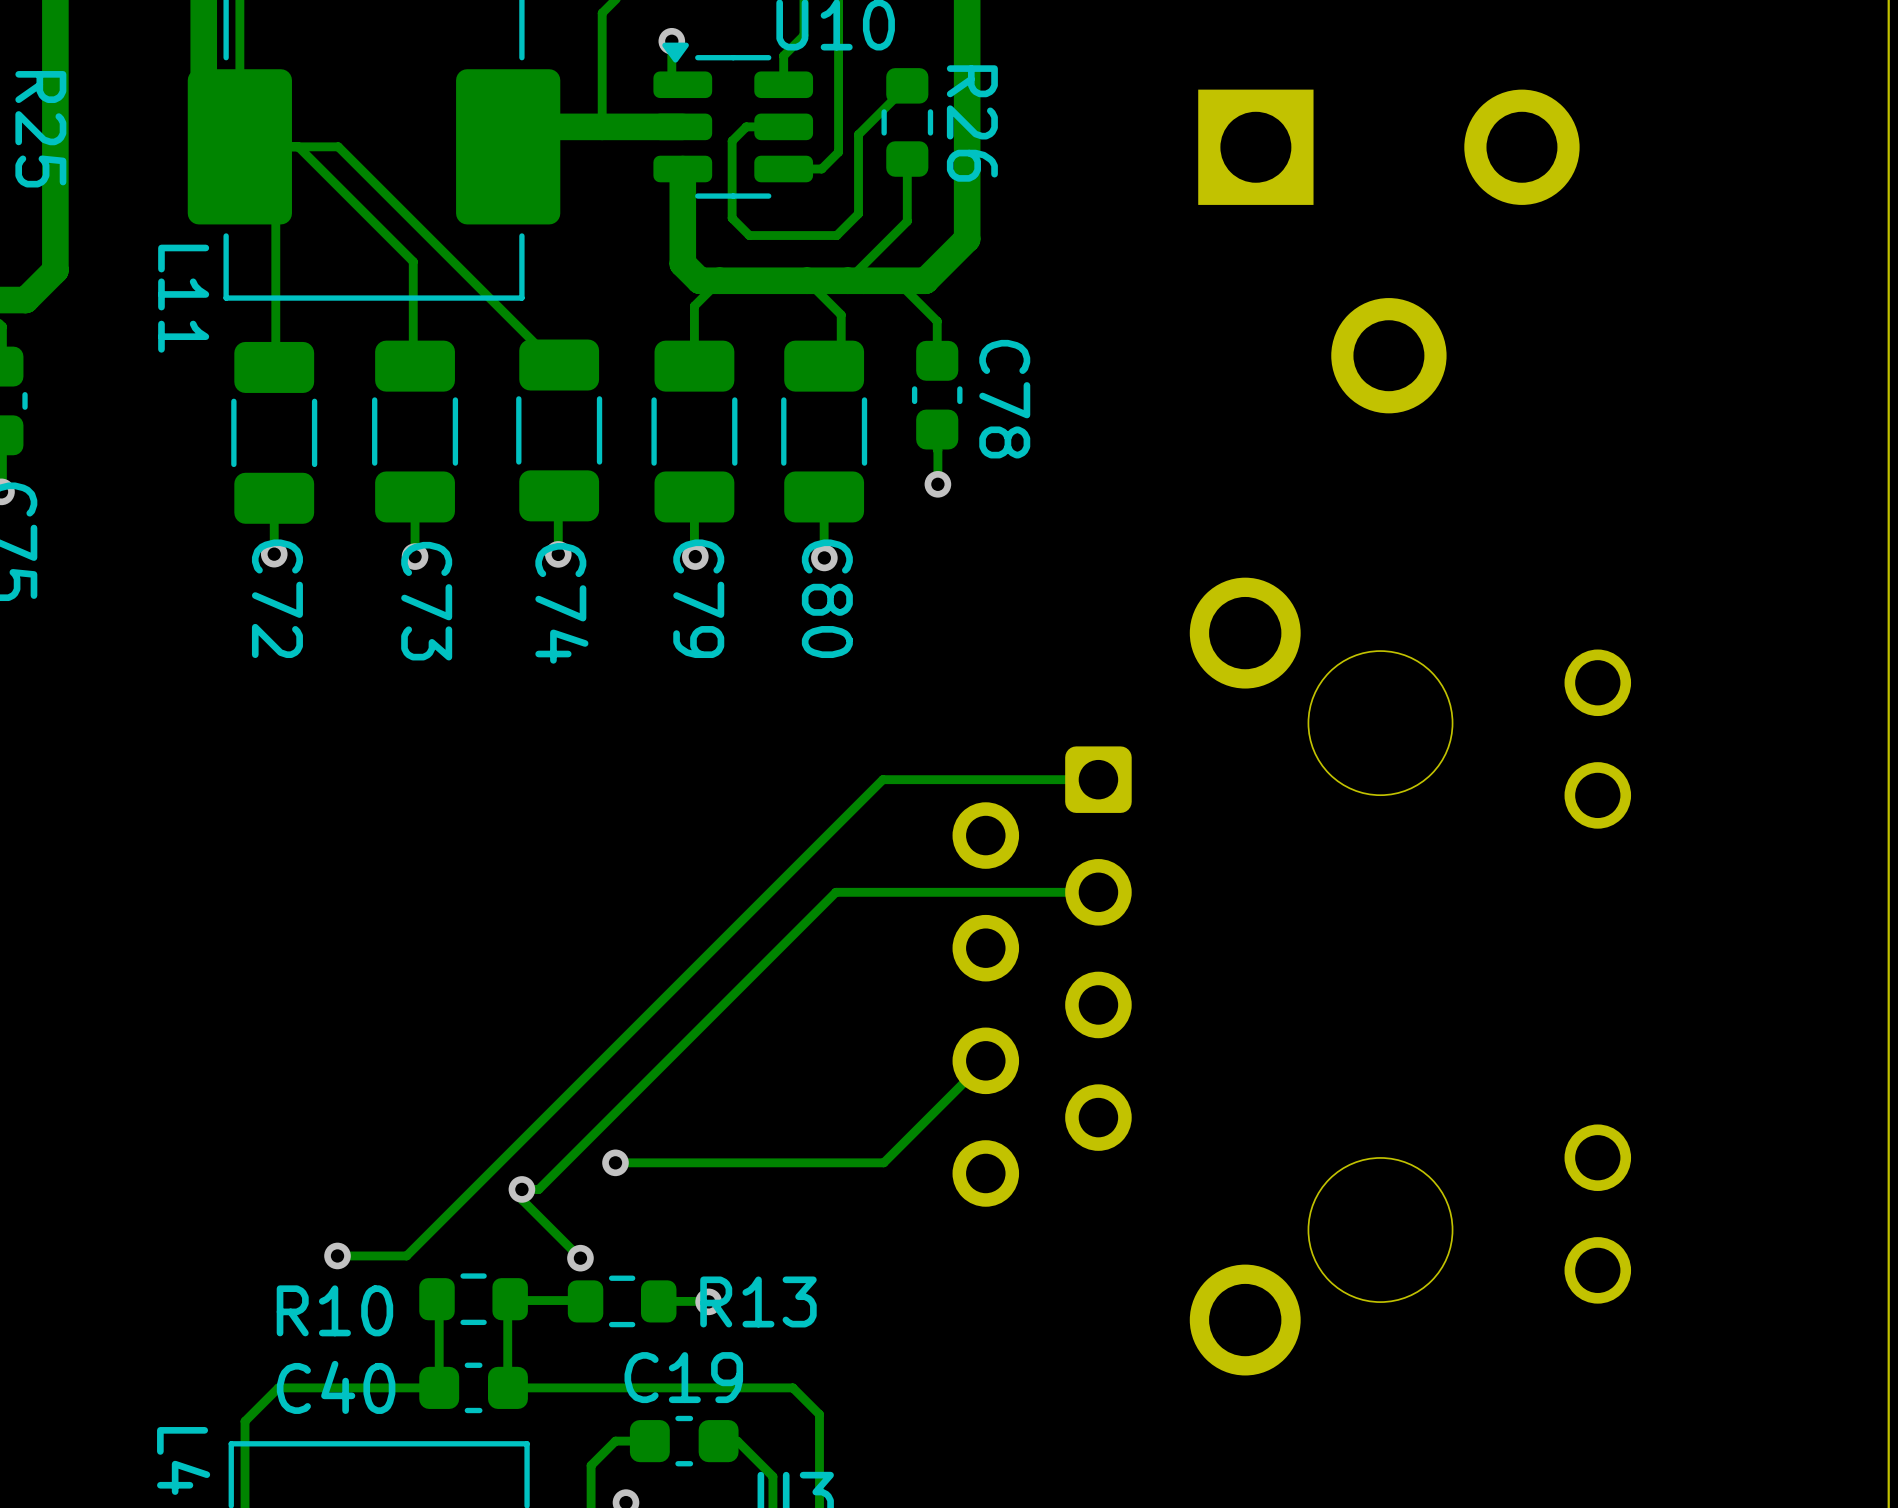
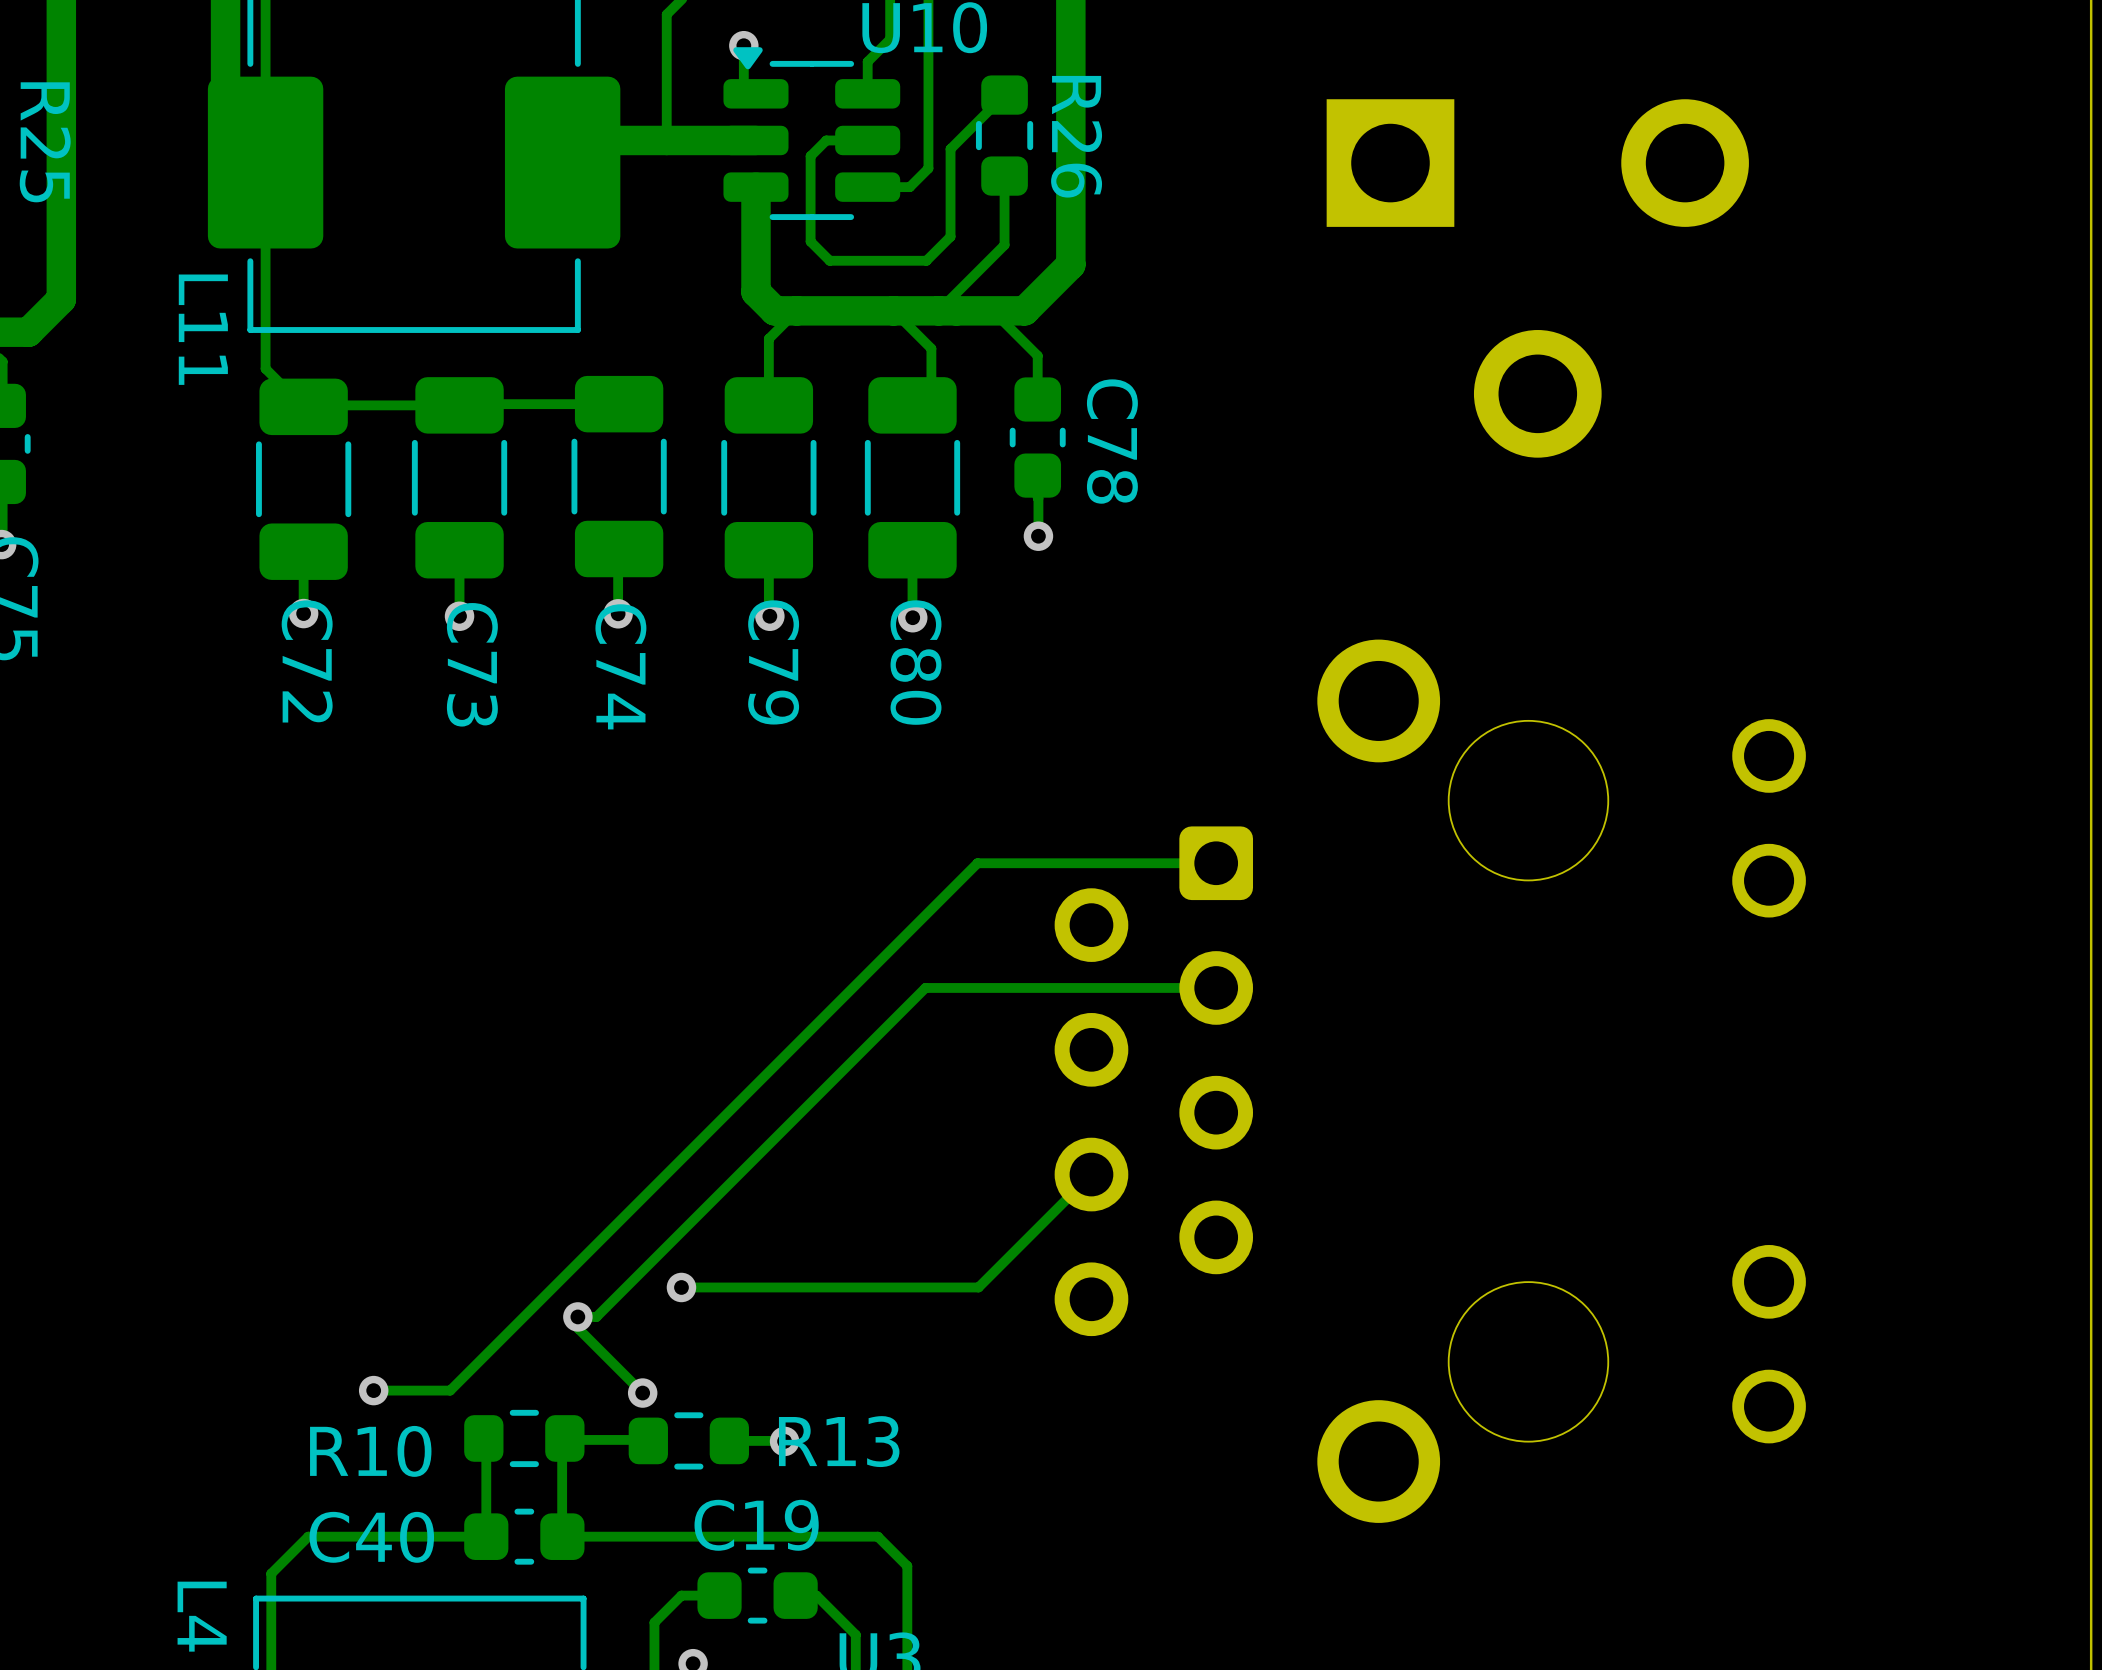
track: none -> (265, 162) (265, 368) (303, 406)
track: (298, 146) (413, 261) (413, 364) (415, 366) -> (305, 405) (459, 405)
track: (556, 365) (338, 146) (239, 146) (275, 182) (275, 365) -> (616, 404) (460, 404)

